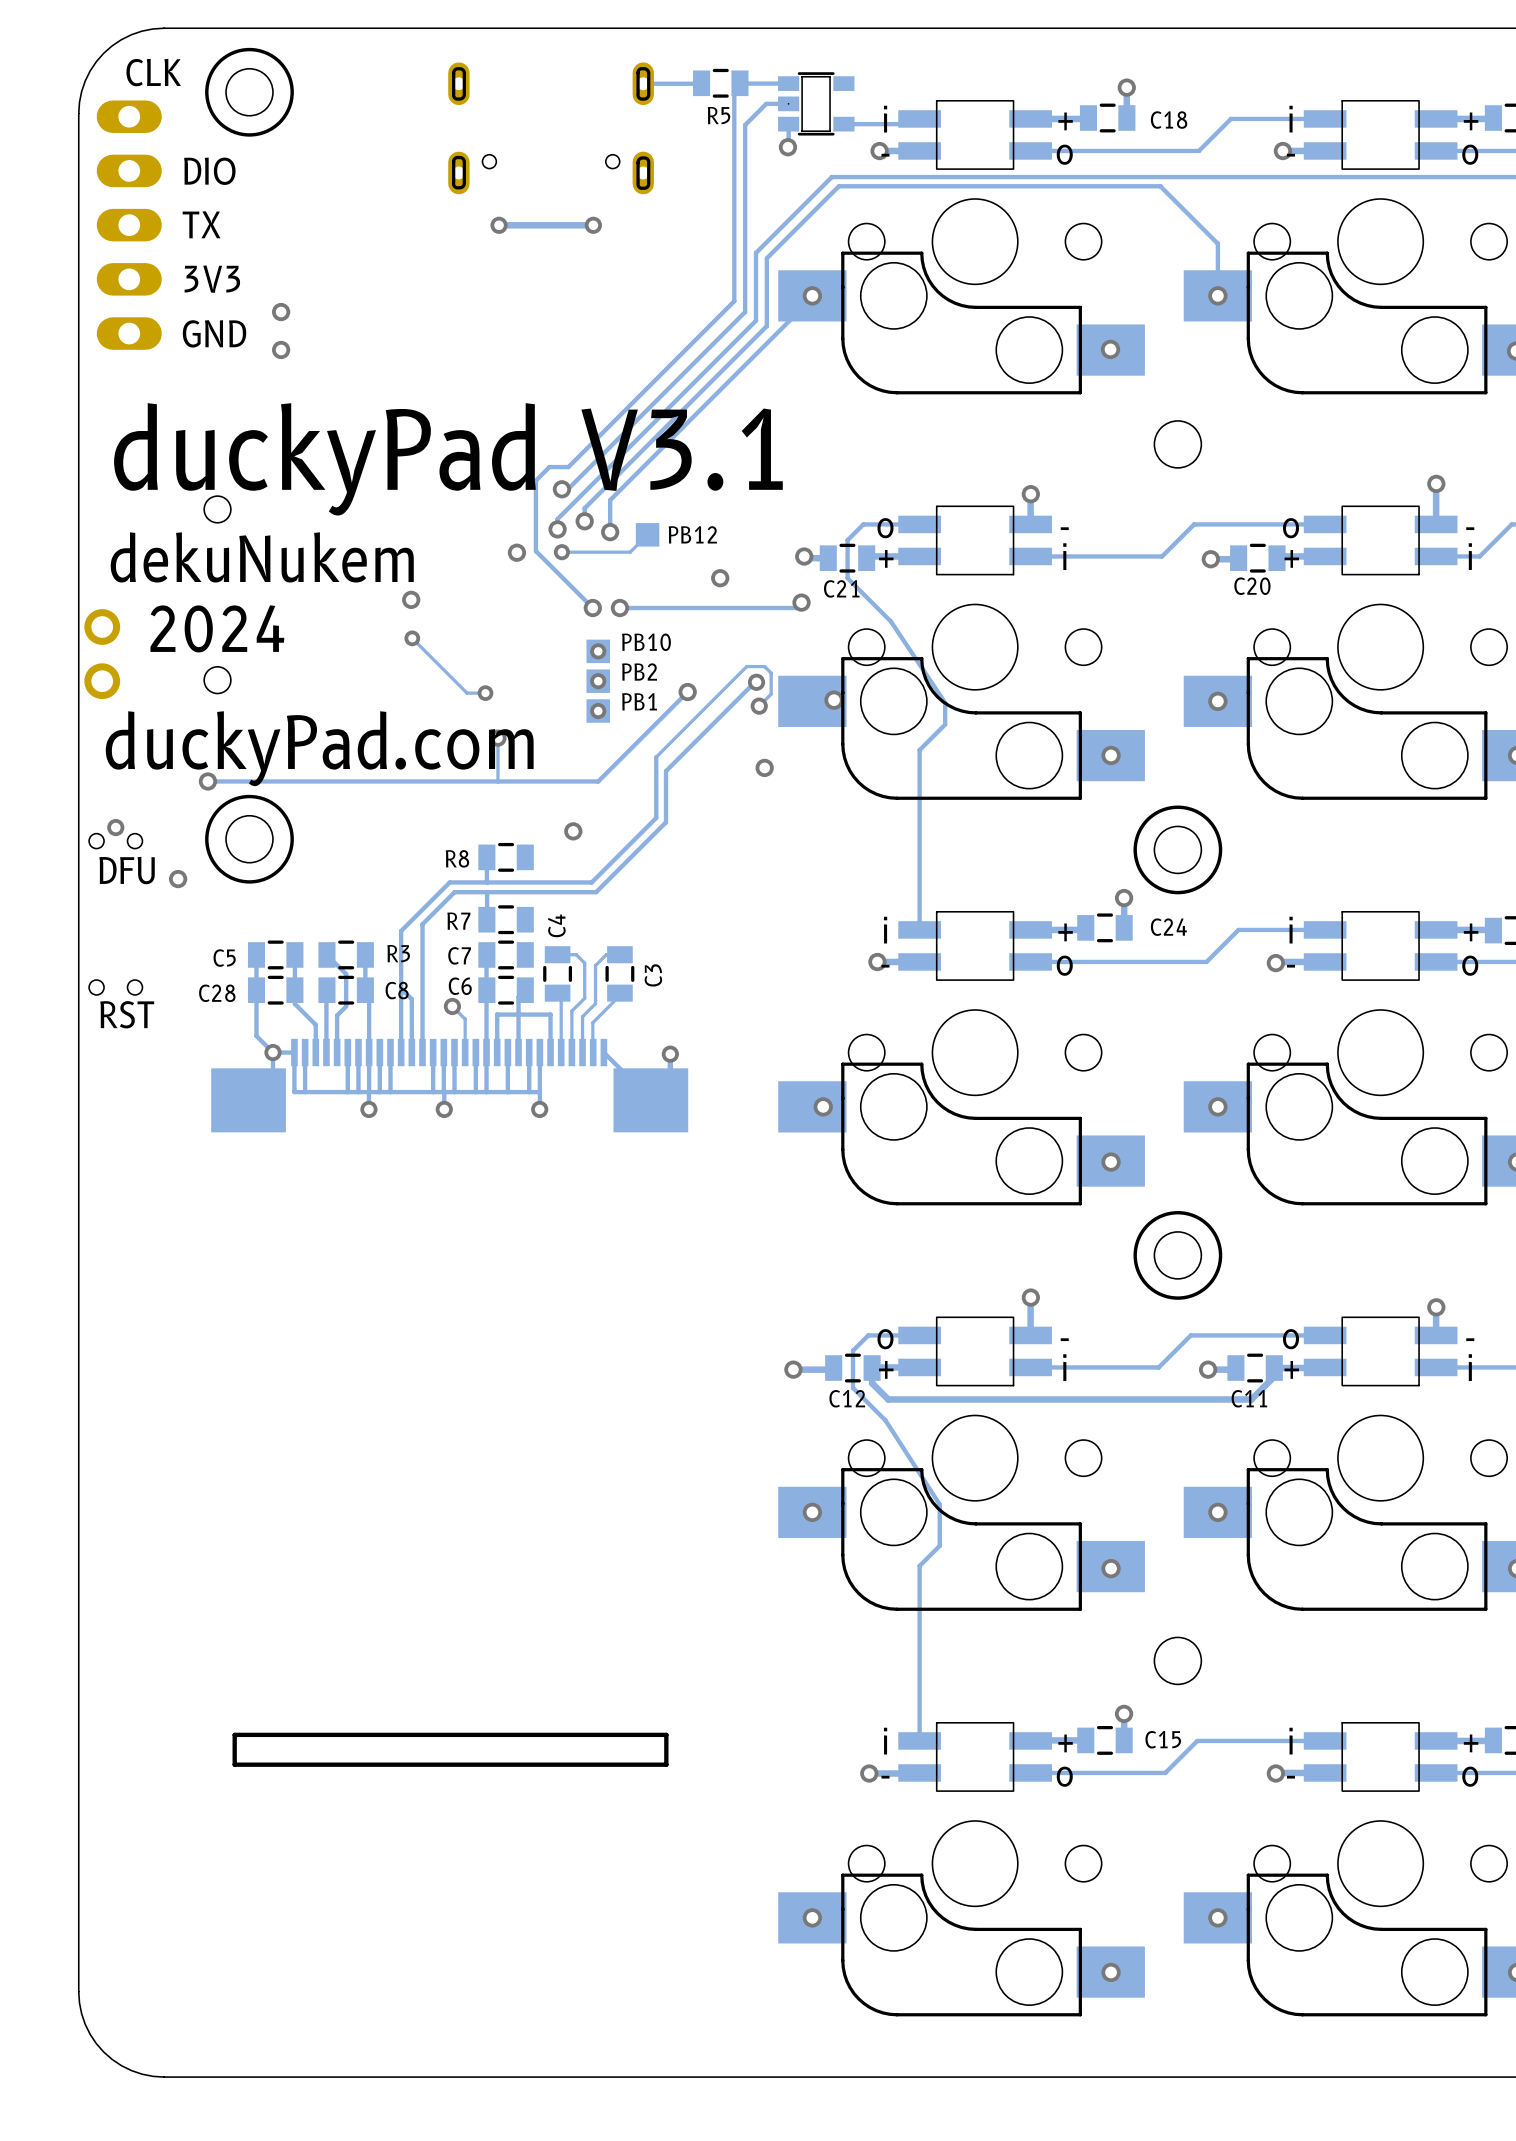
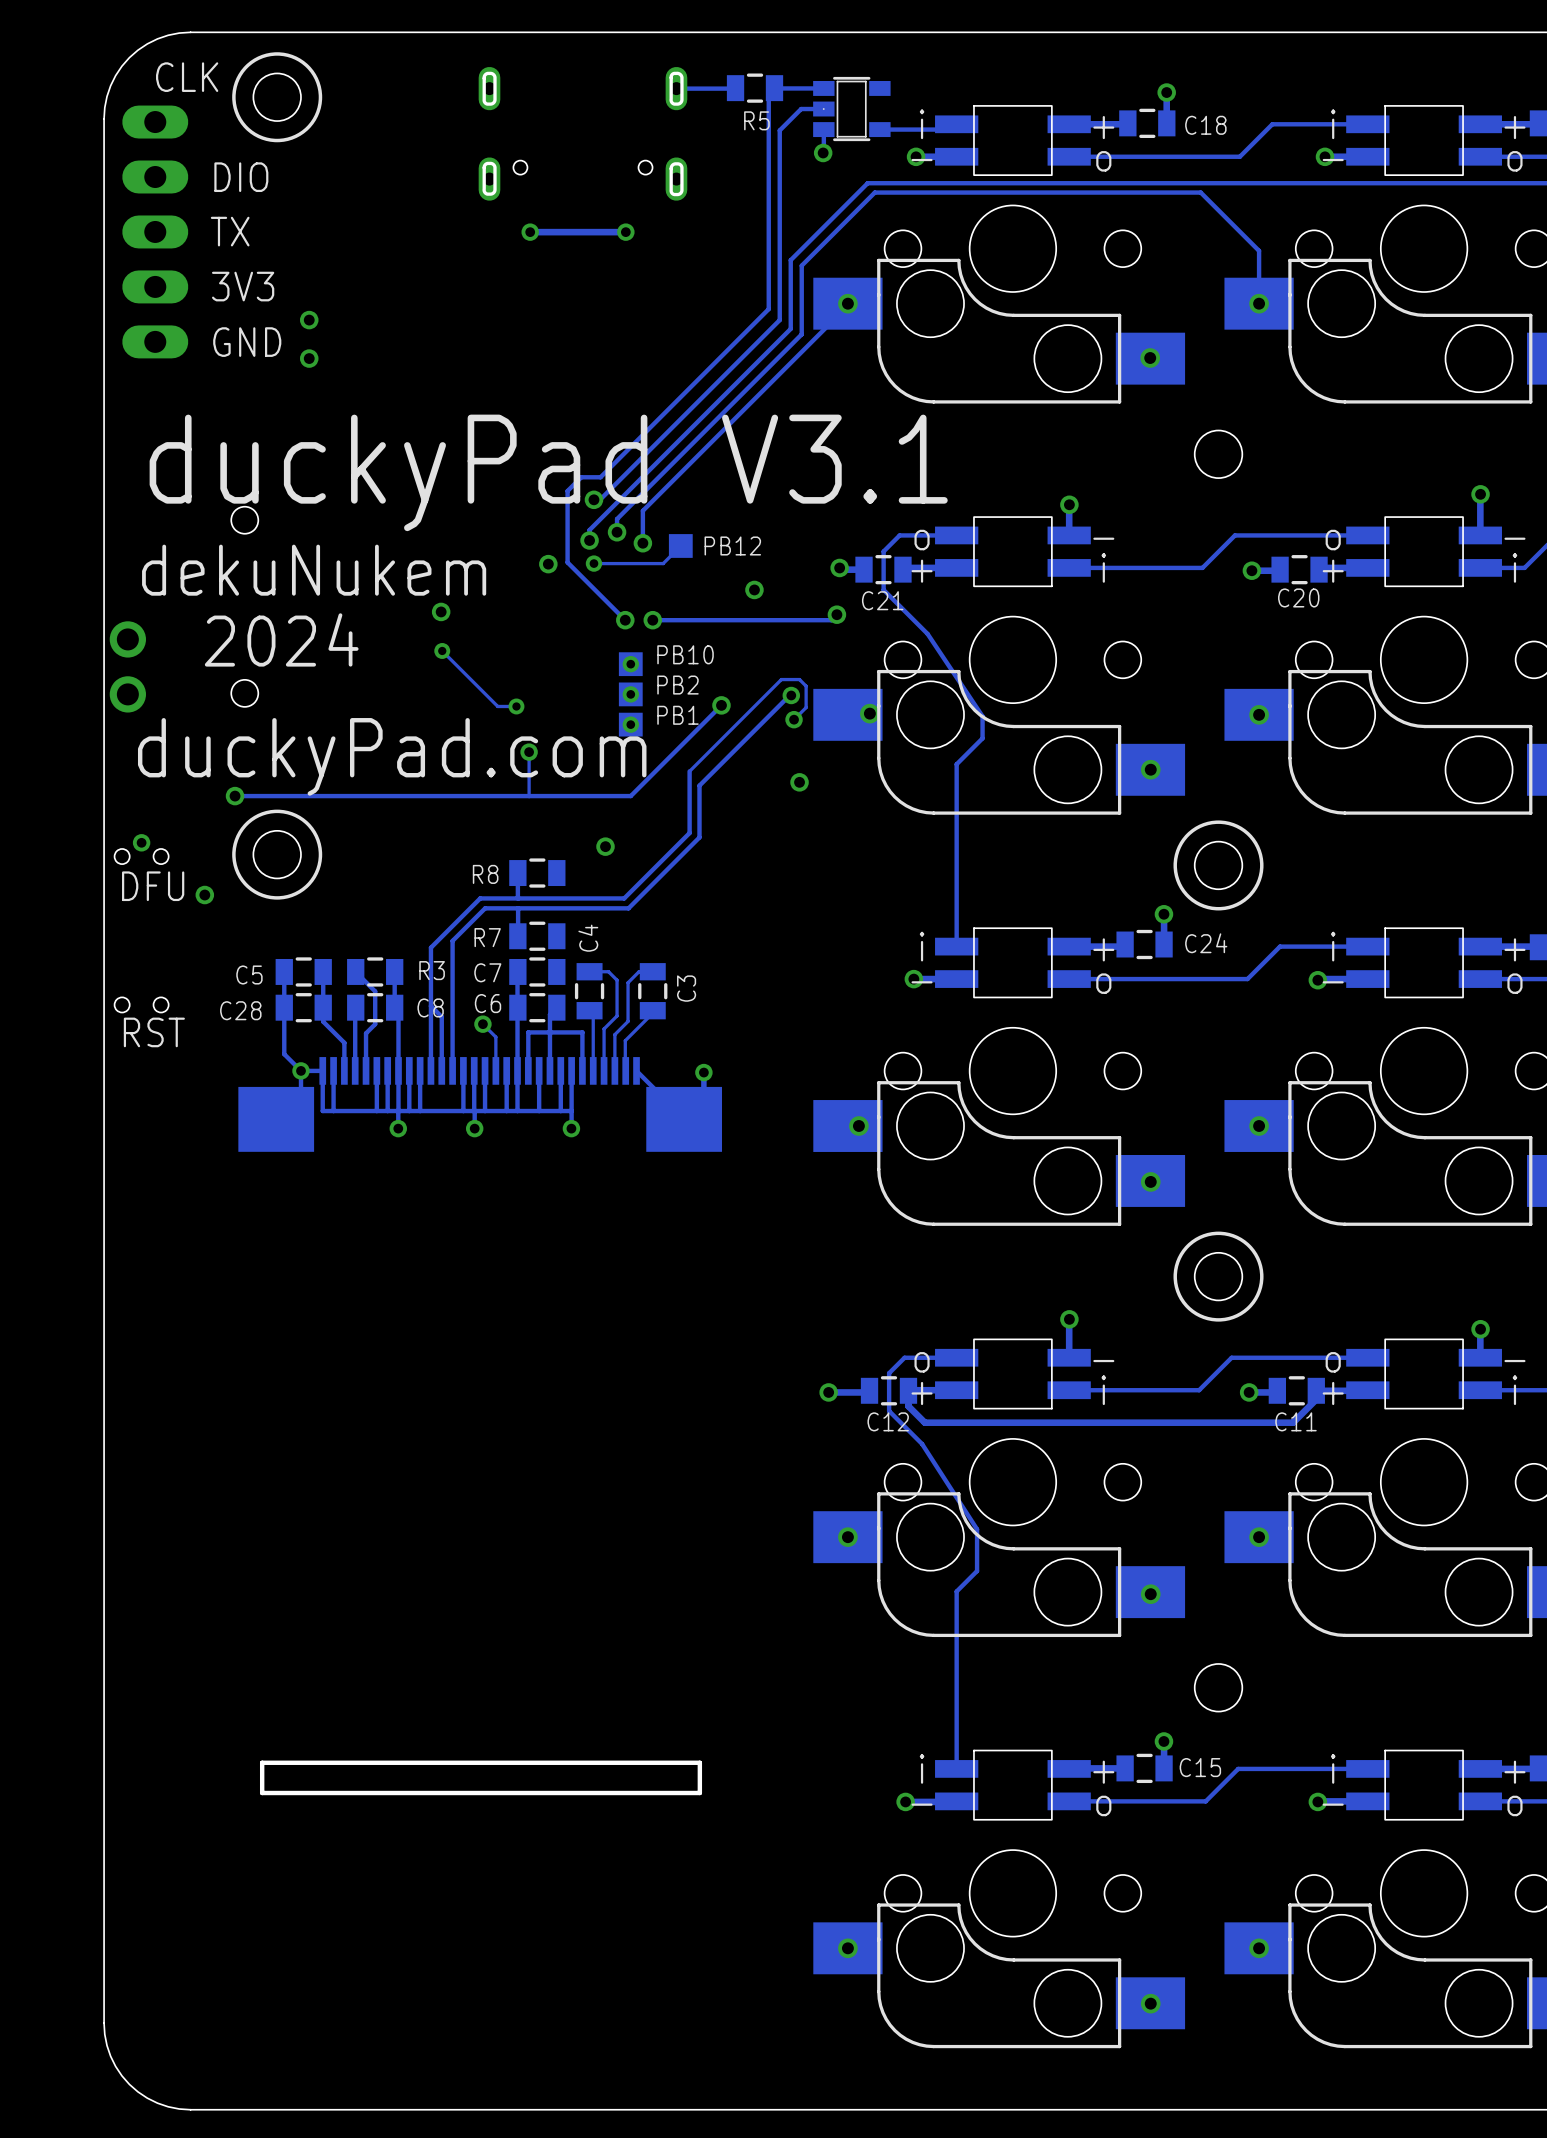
text position: duckyPad.com (319, 748) -> duckyPad.com (392, 756)

